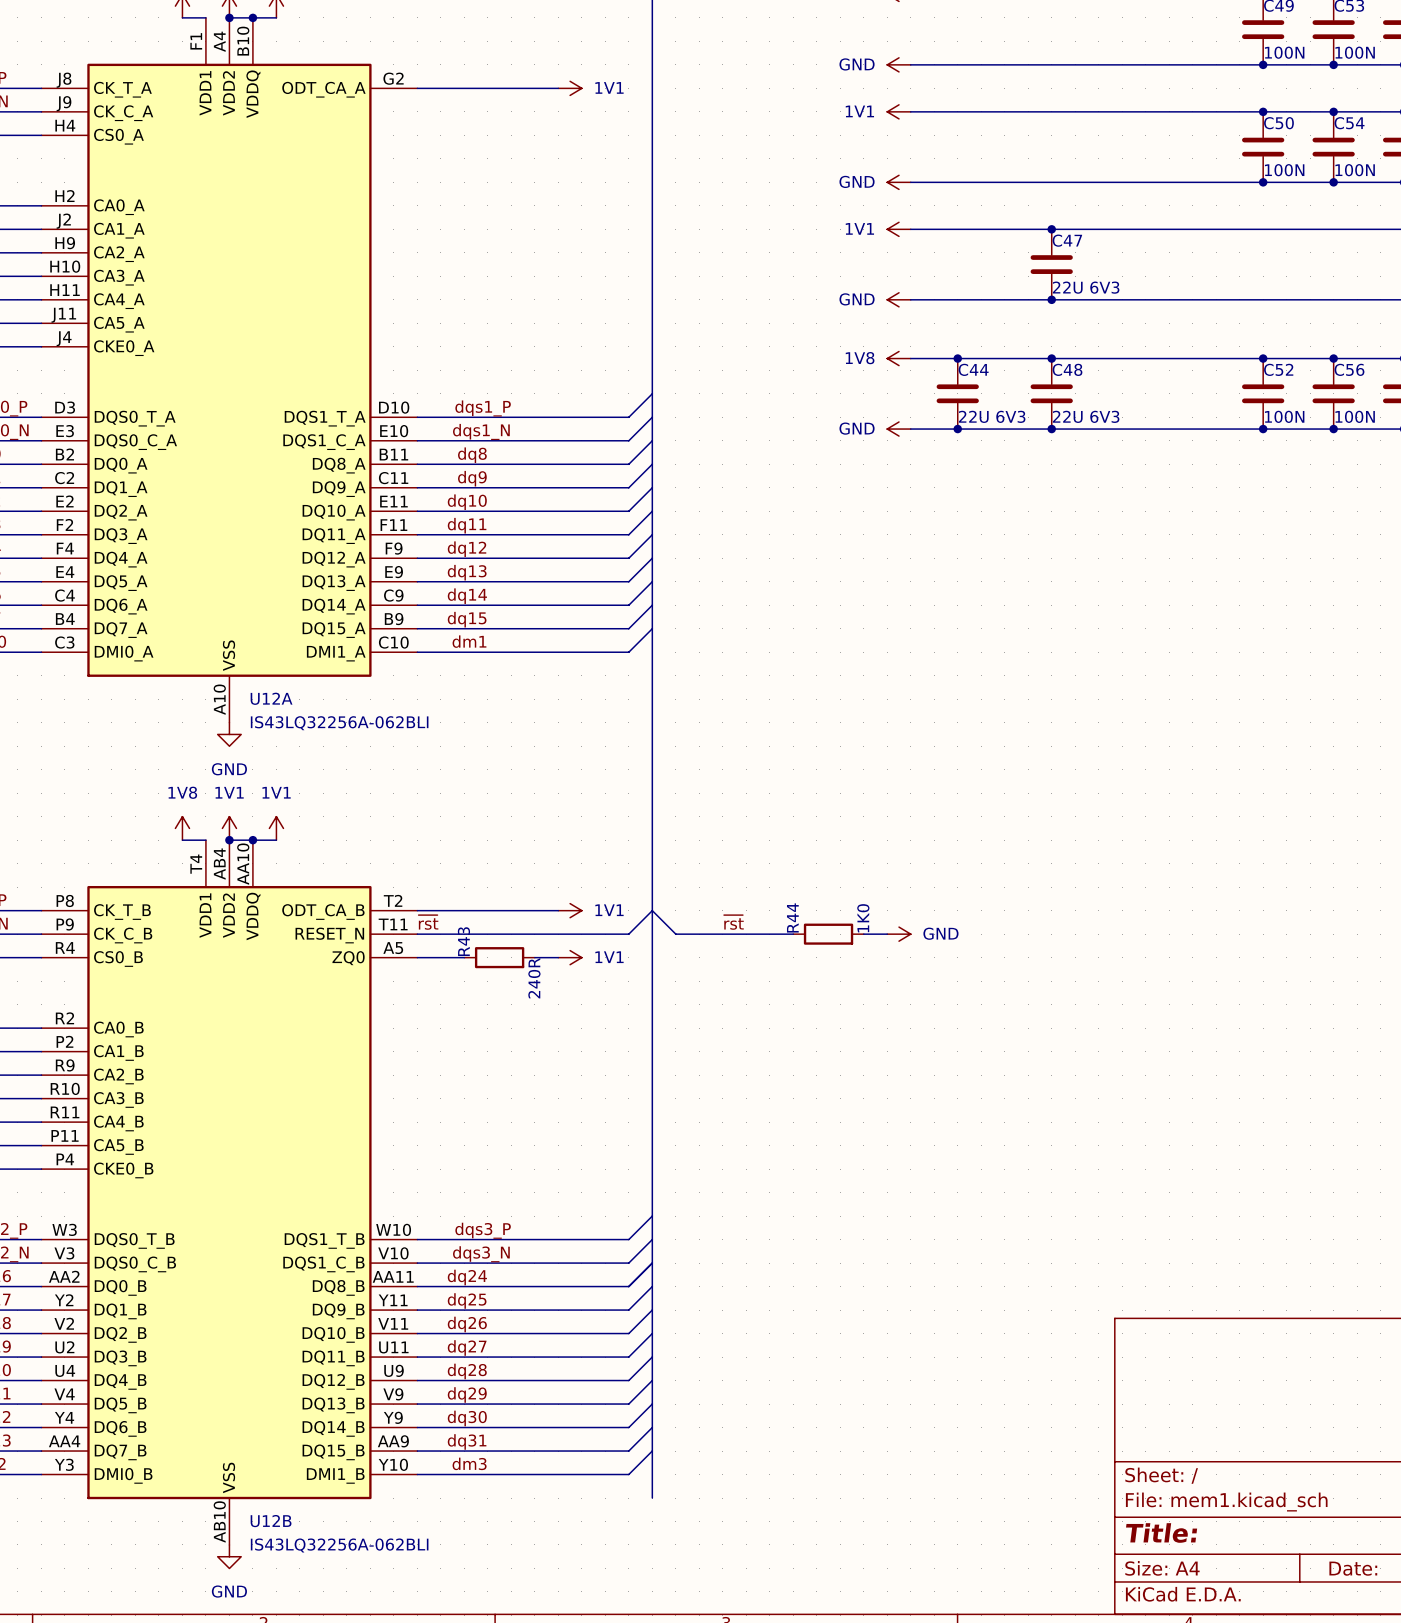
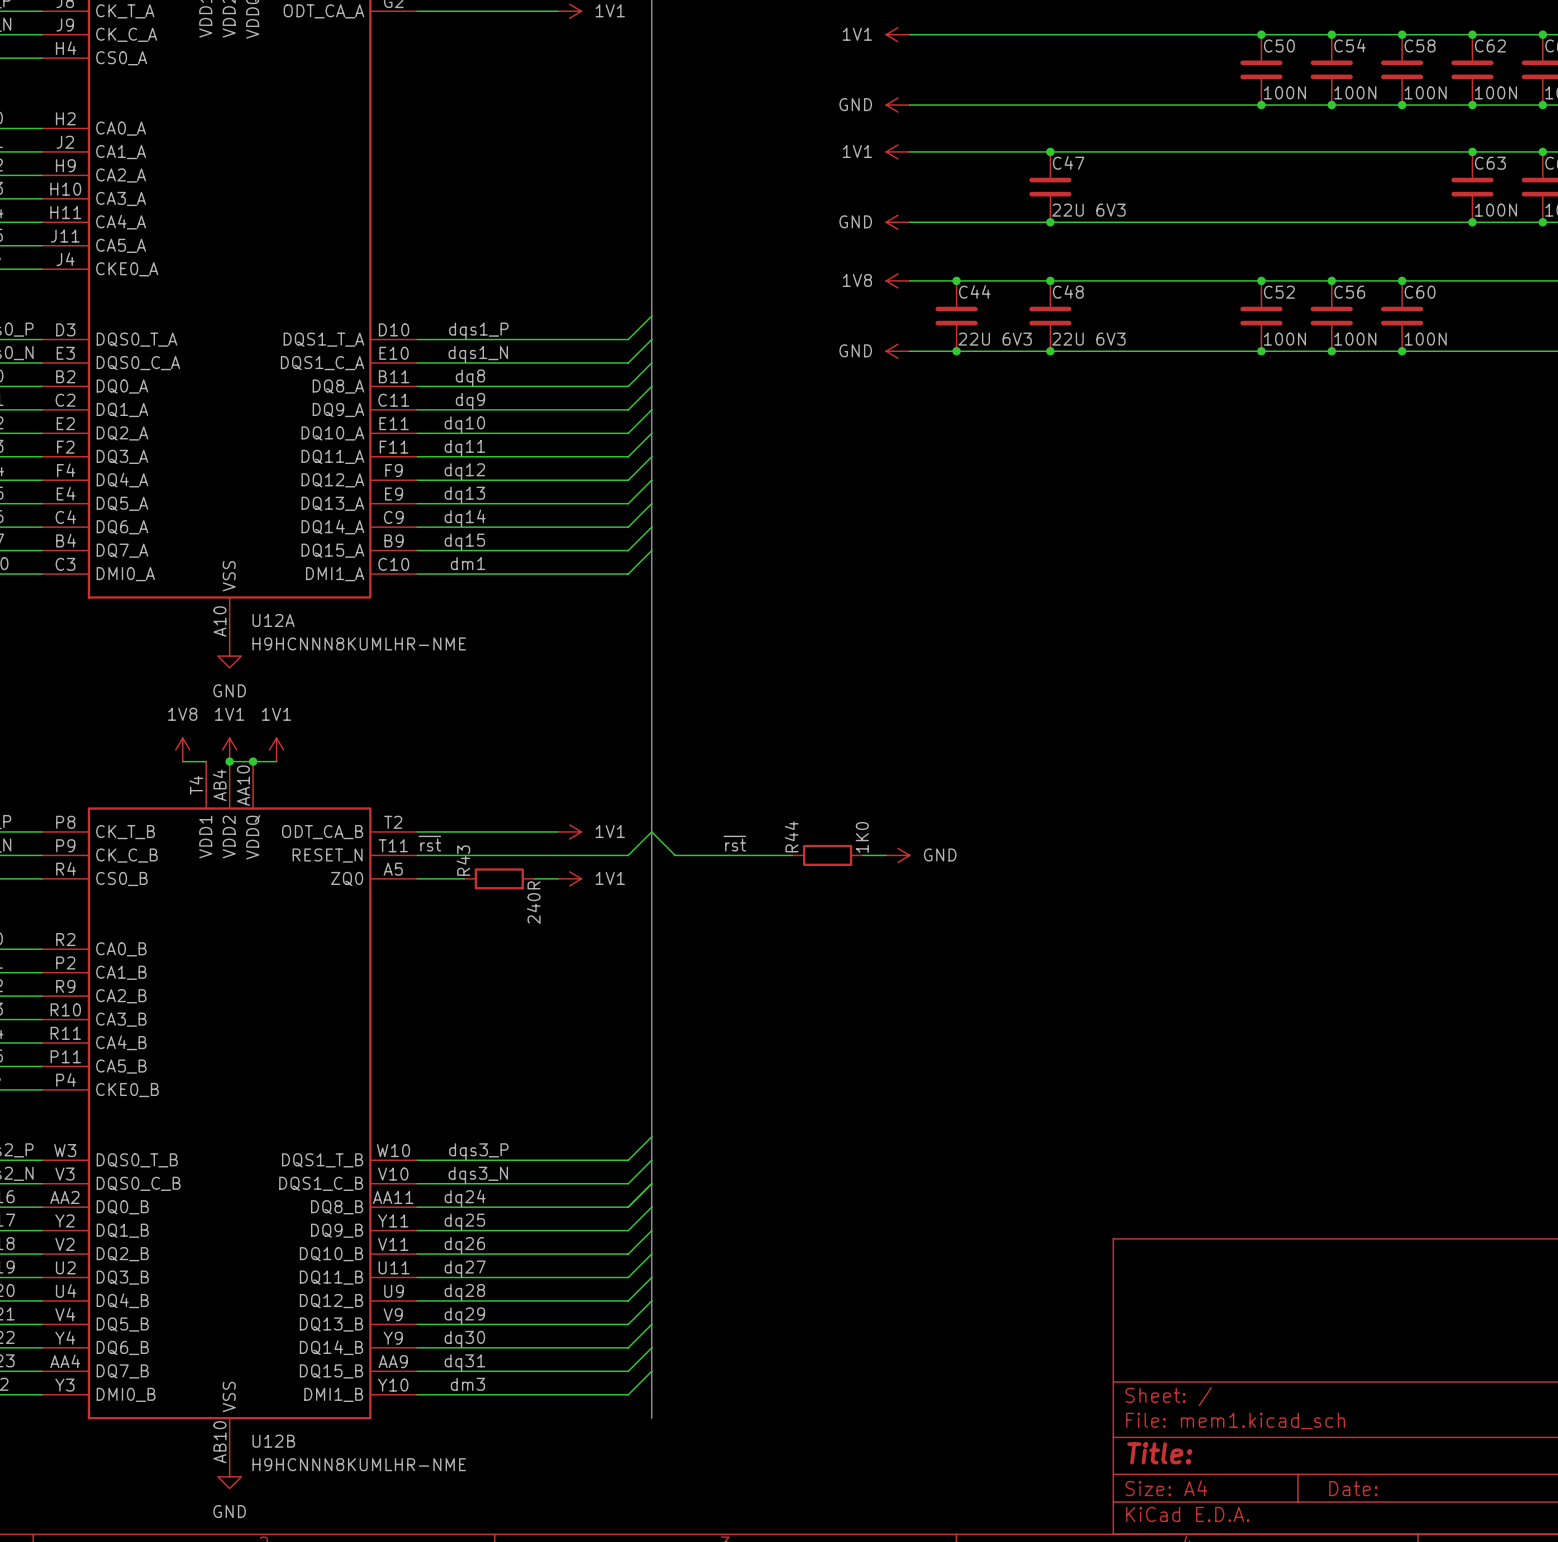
U12A value: IS43LQ32256A-062BLI (339, 723) -> H9HCNNN8KUMLHR-NME (359, 643)
U12B value: IS43LQ32256A-062BLI (339, 1545) -> H9HCNNN8KUMLHR-NME (359, 1464)

